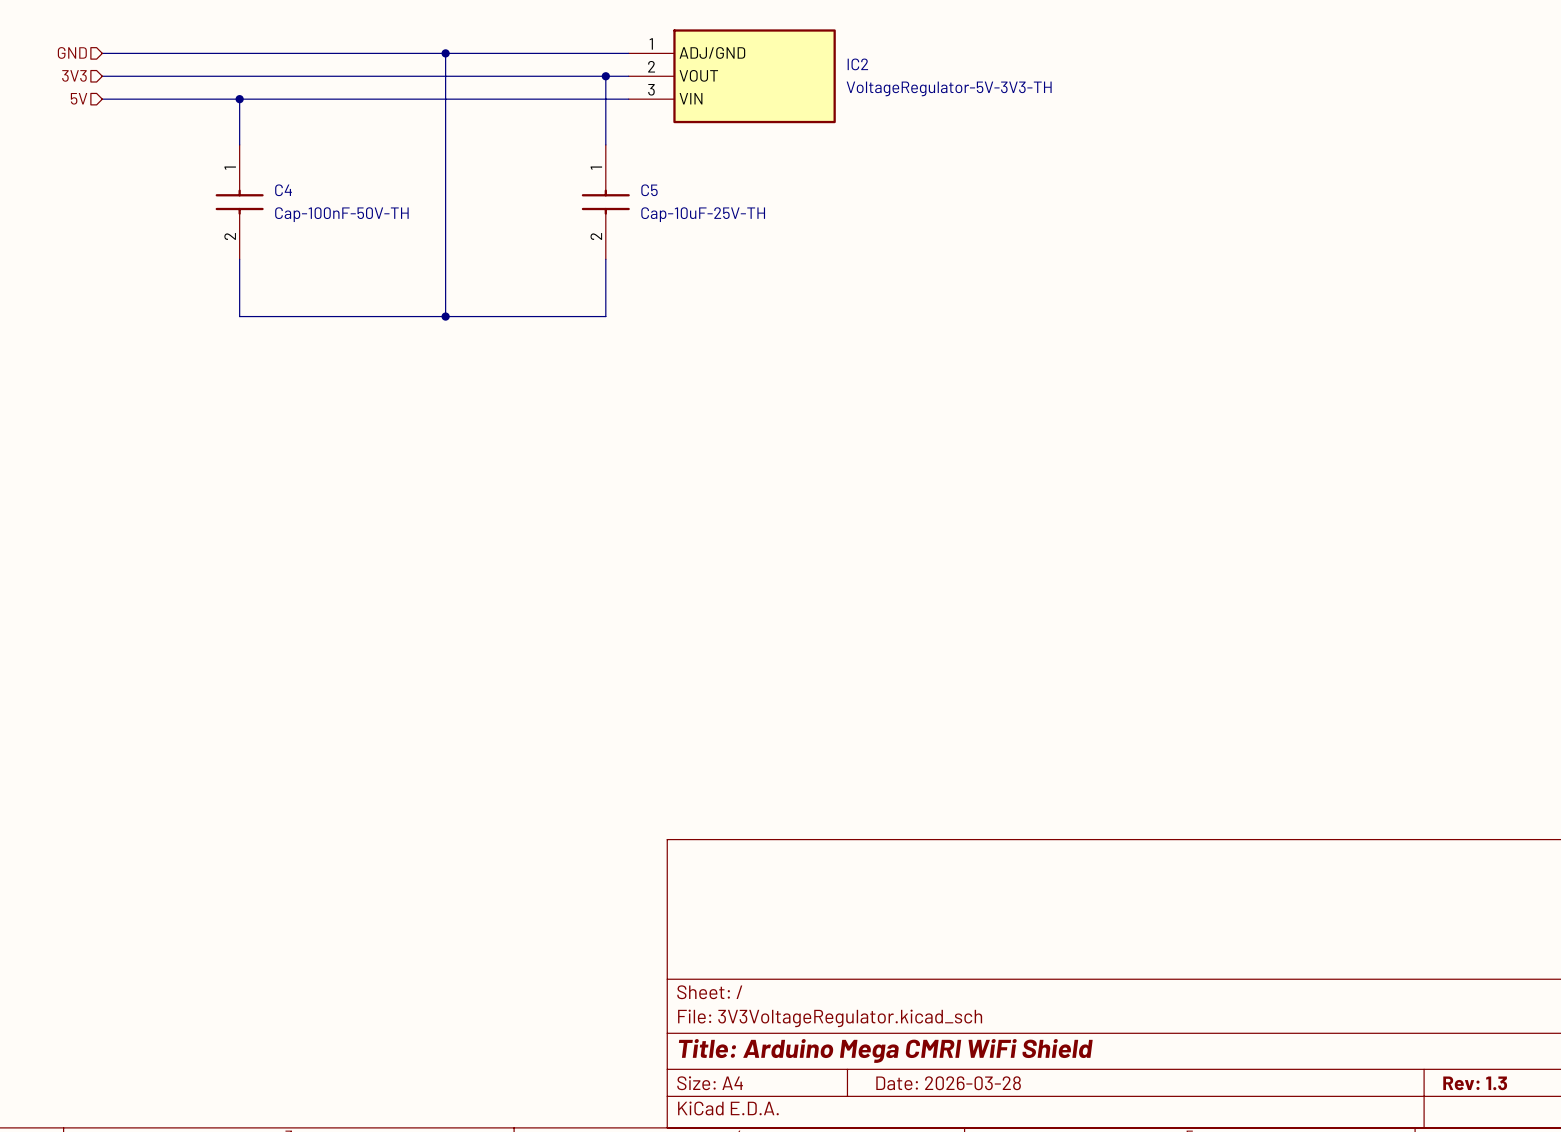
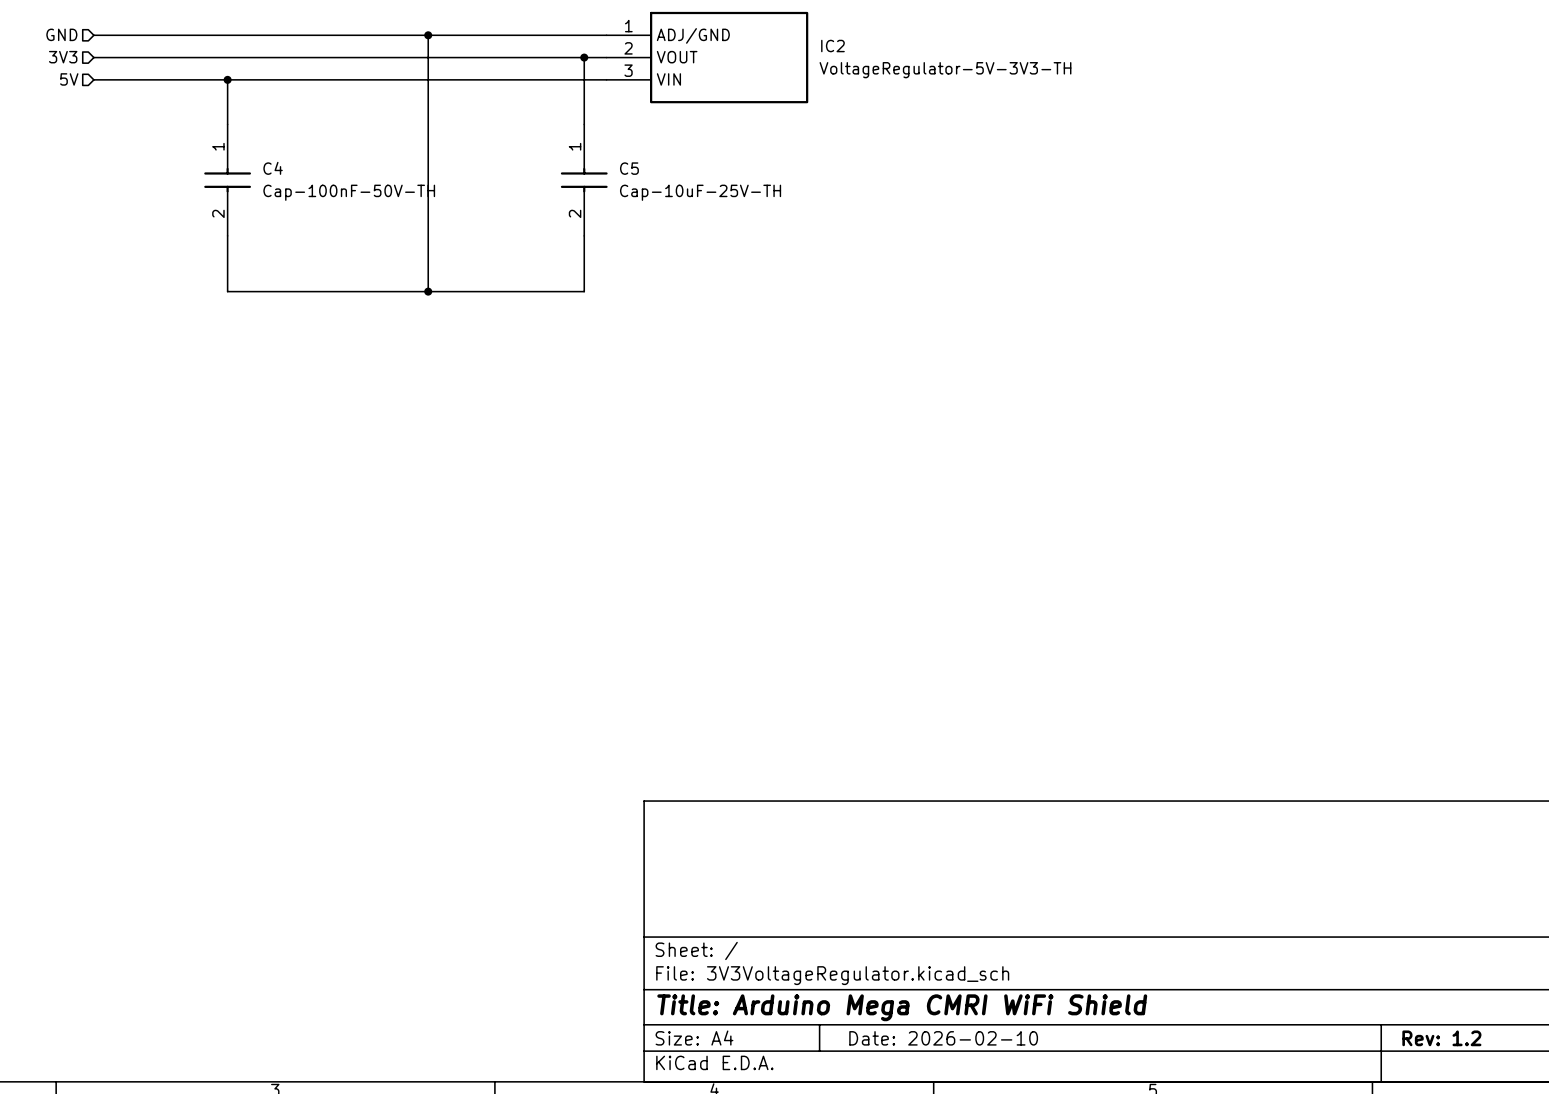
title block: Date: 2026-03-28 (948, 1083) -> Date: 2026-02-10 (943, 1038)
title block: Rev: 1.3 (1475, 1083) -> Rev: 1.2 (1441, 1038)

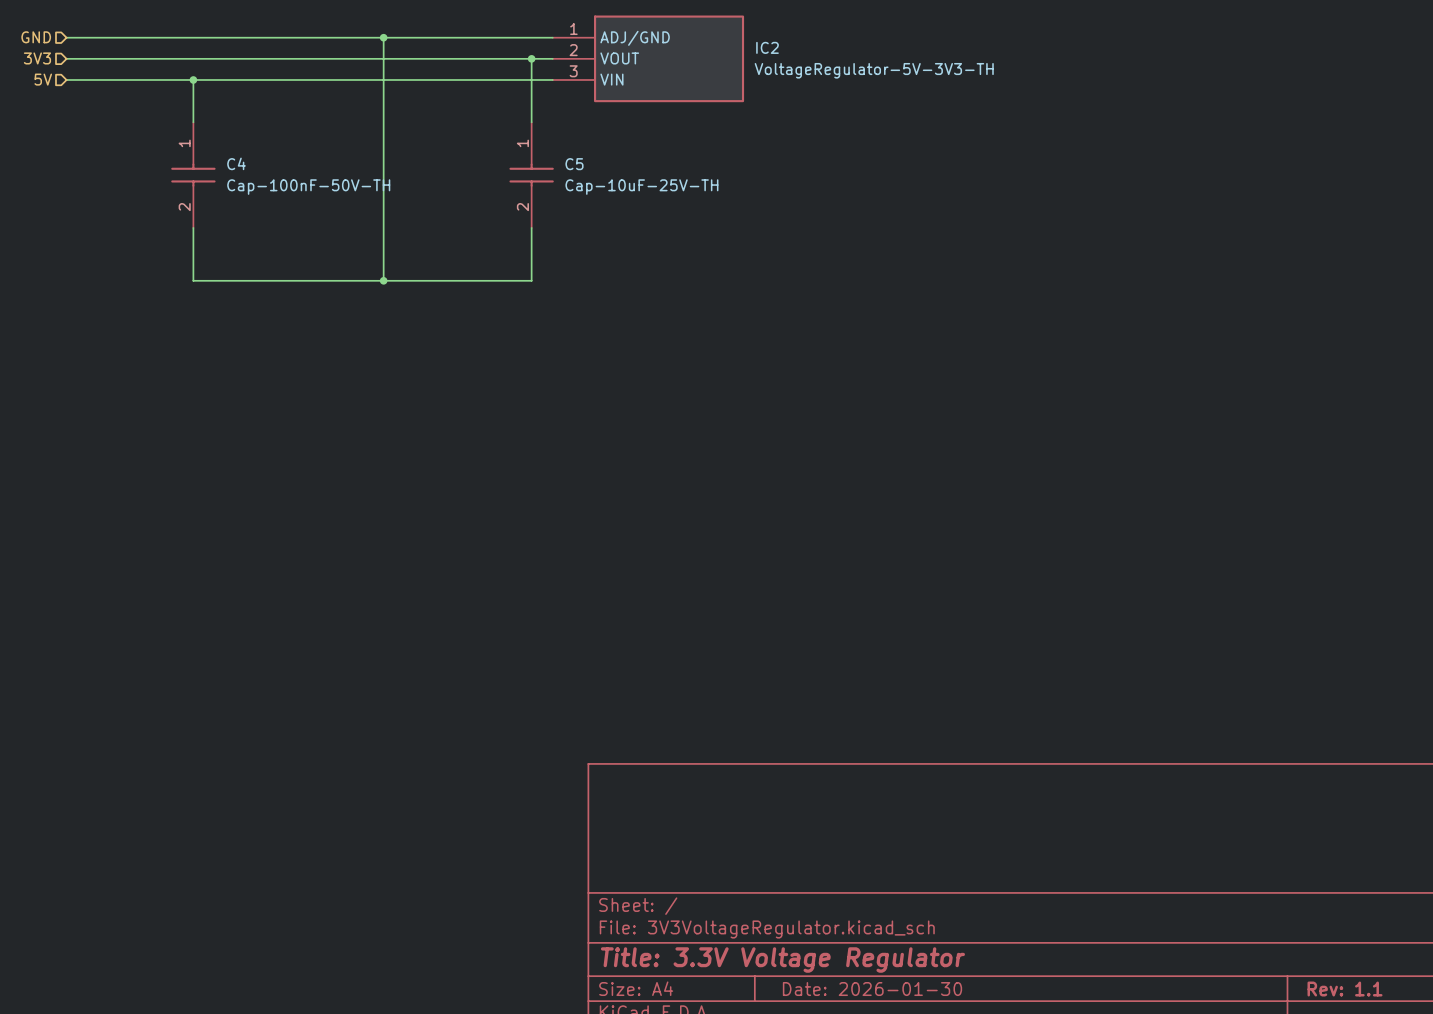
title block: Title: Arduino Mega CMRI WiFi Shield (902, 1007) -> Title: 3.3V Voltage Regulator (782, 960)
title block: Date: 2026-02-10 (943, 1038) -> Date: 2026-01-30 (872, 989)
title block: Rev: 1.2 (1441, 1038) -> Rev: 1.1 (1345, 989)

